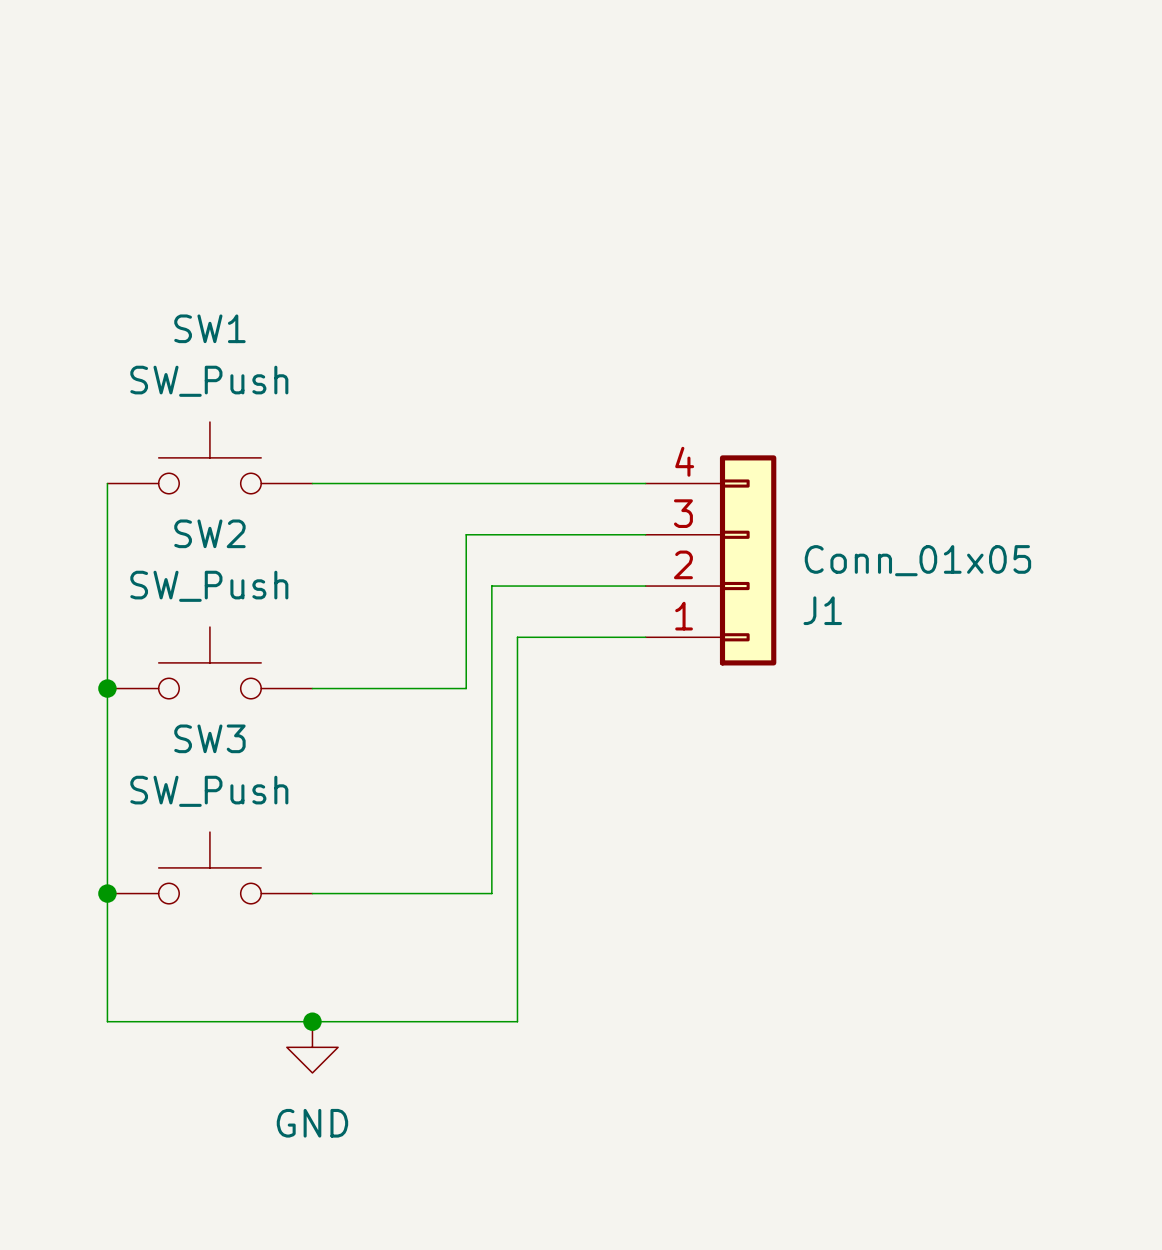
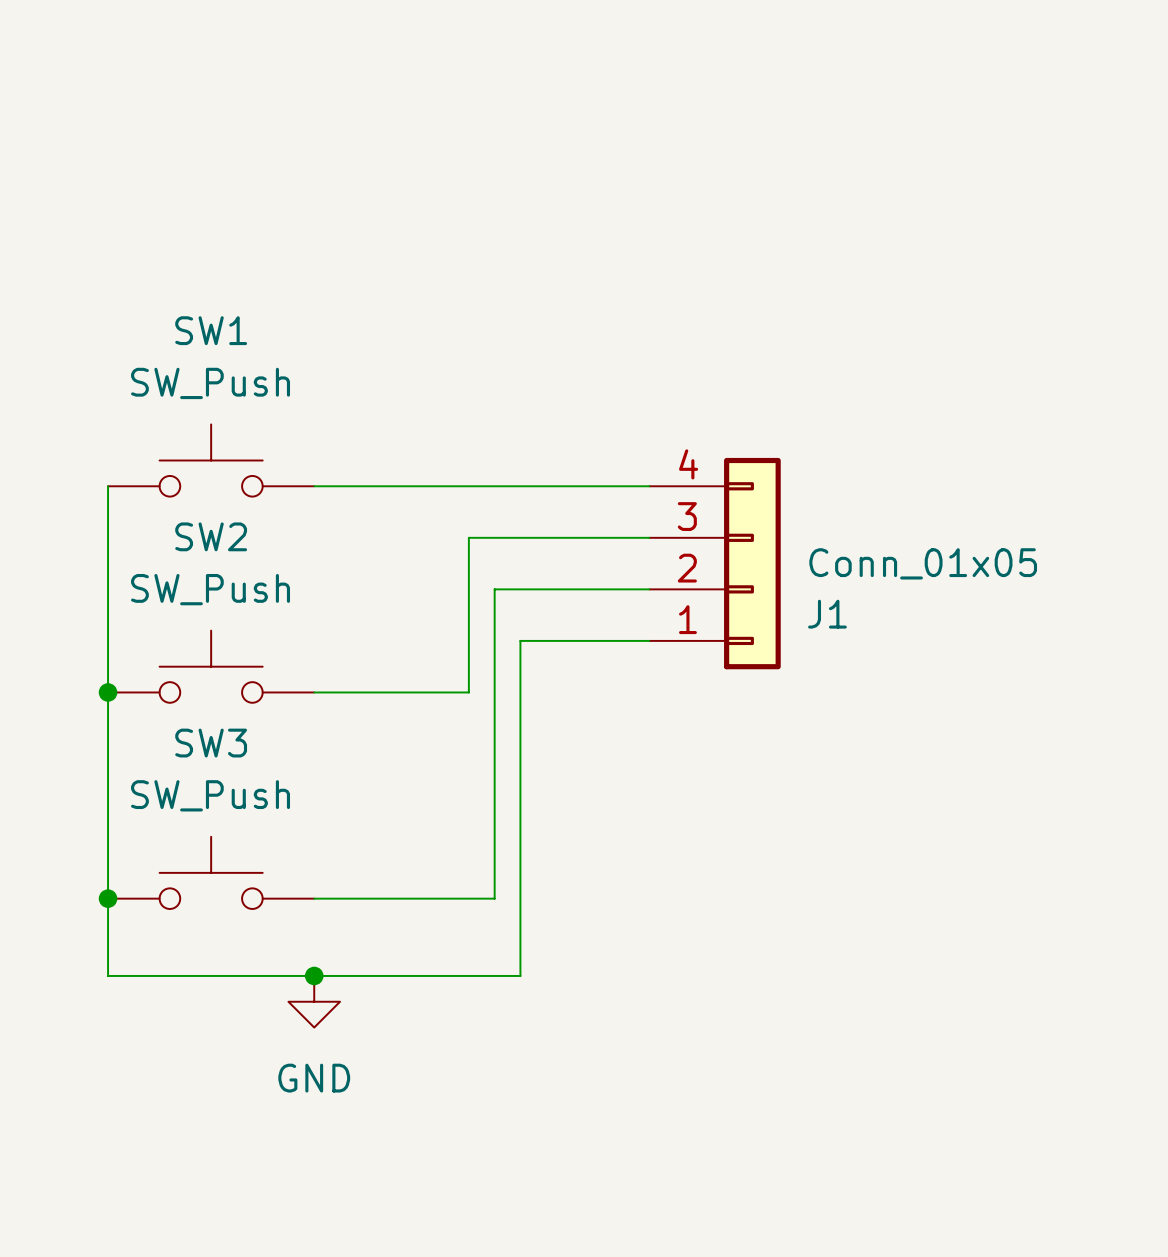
wire: (107, 970) (107, 1021) (517, 1021) (517, 970) -> (108, 975) (520, 975)
junction position: (312, 1021) -> (314, 975)
power symbol position: GND (312, 1047) -> GND (314, 1001)

